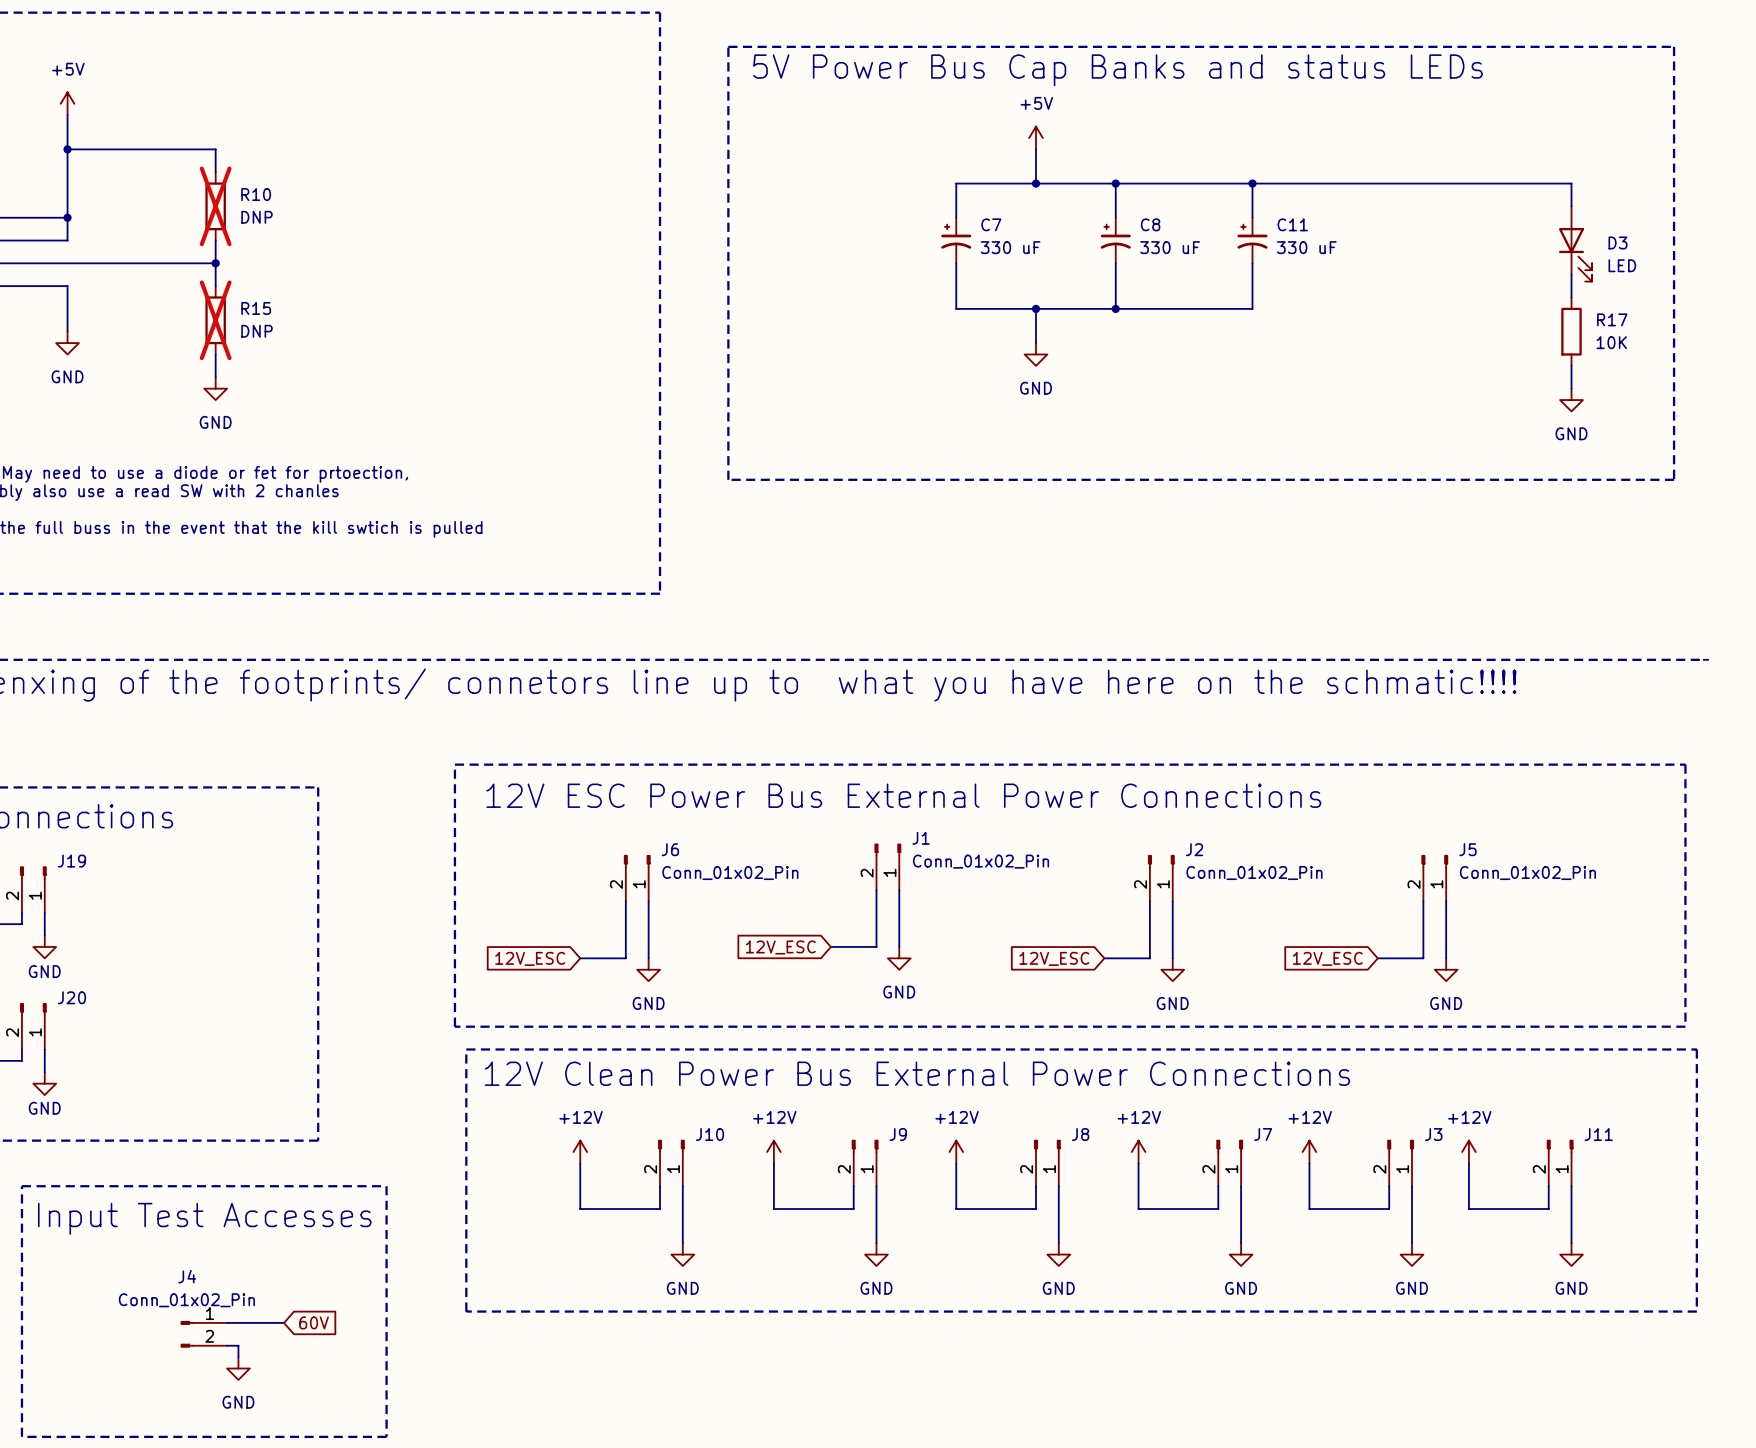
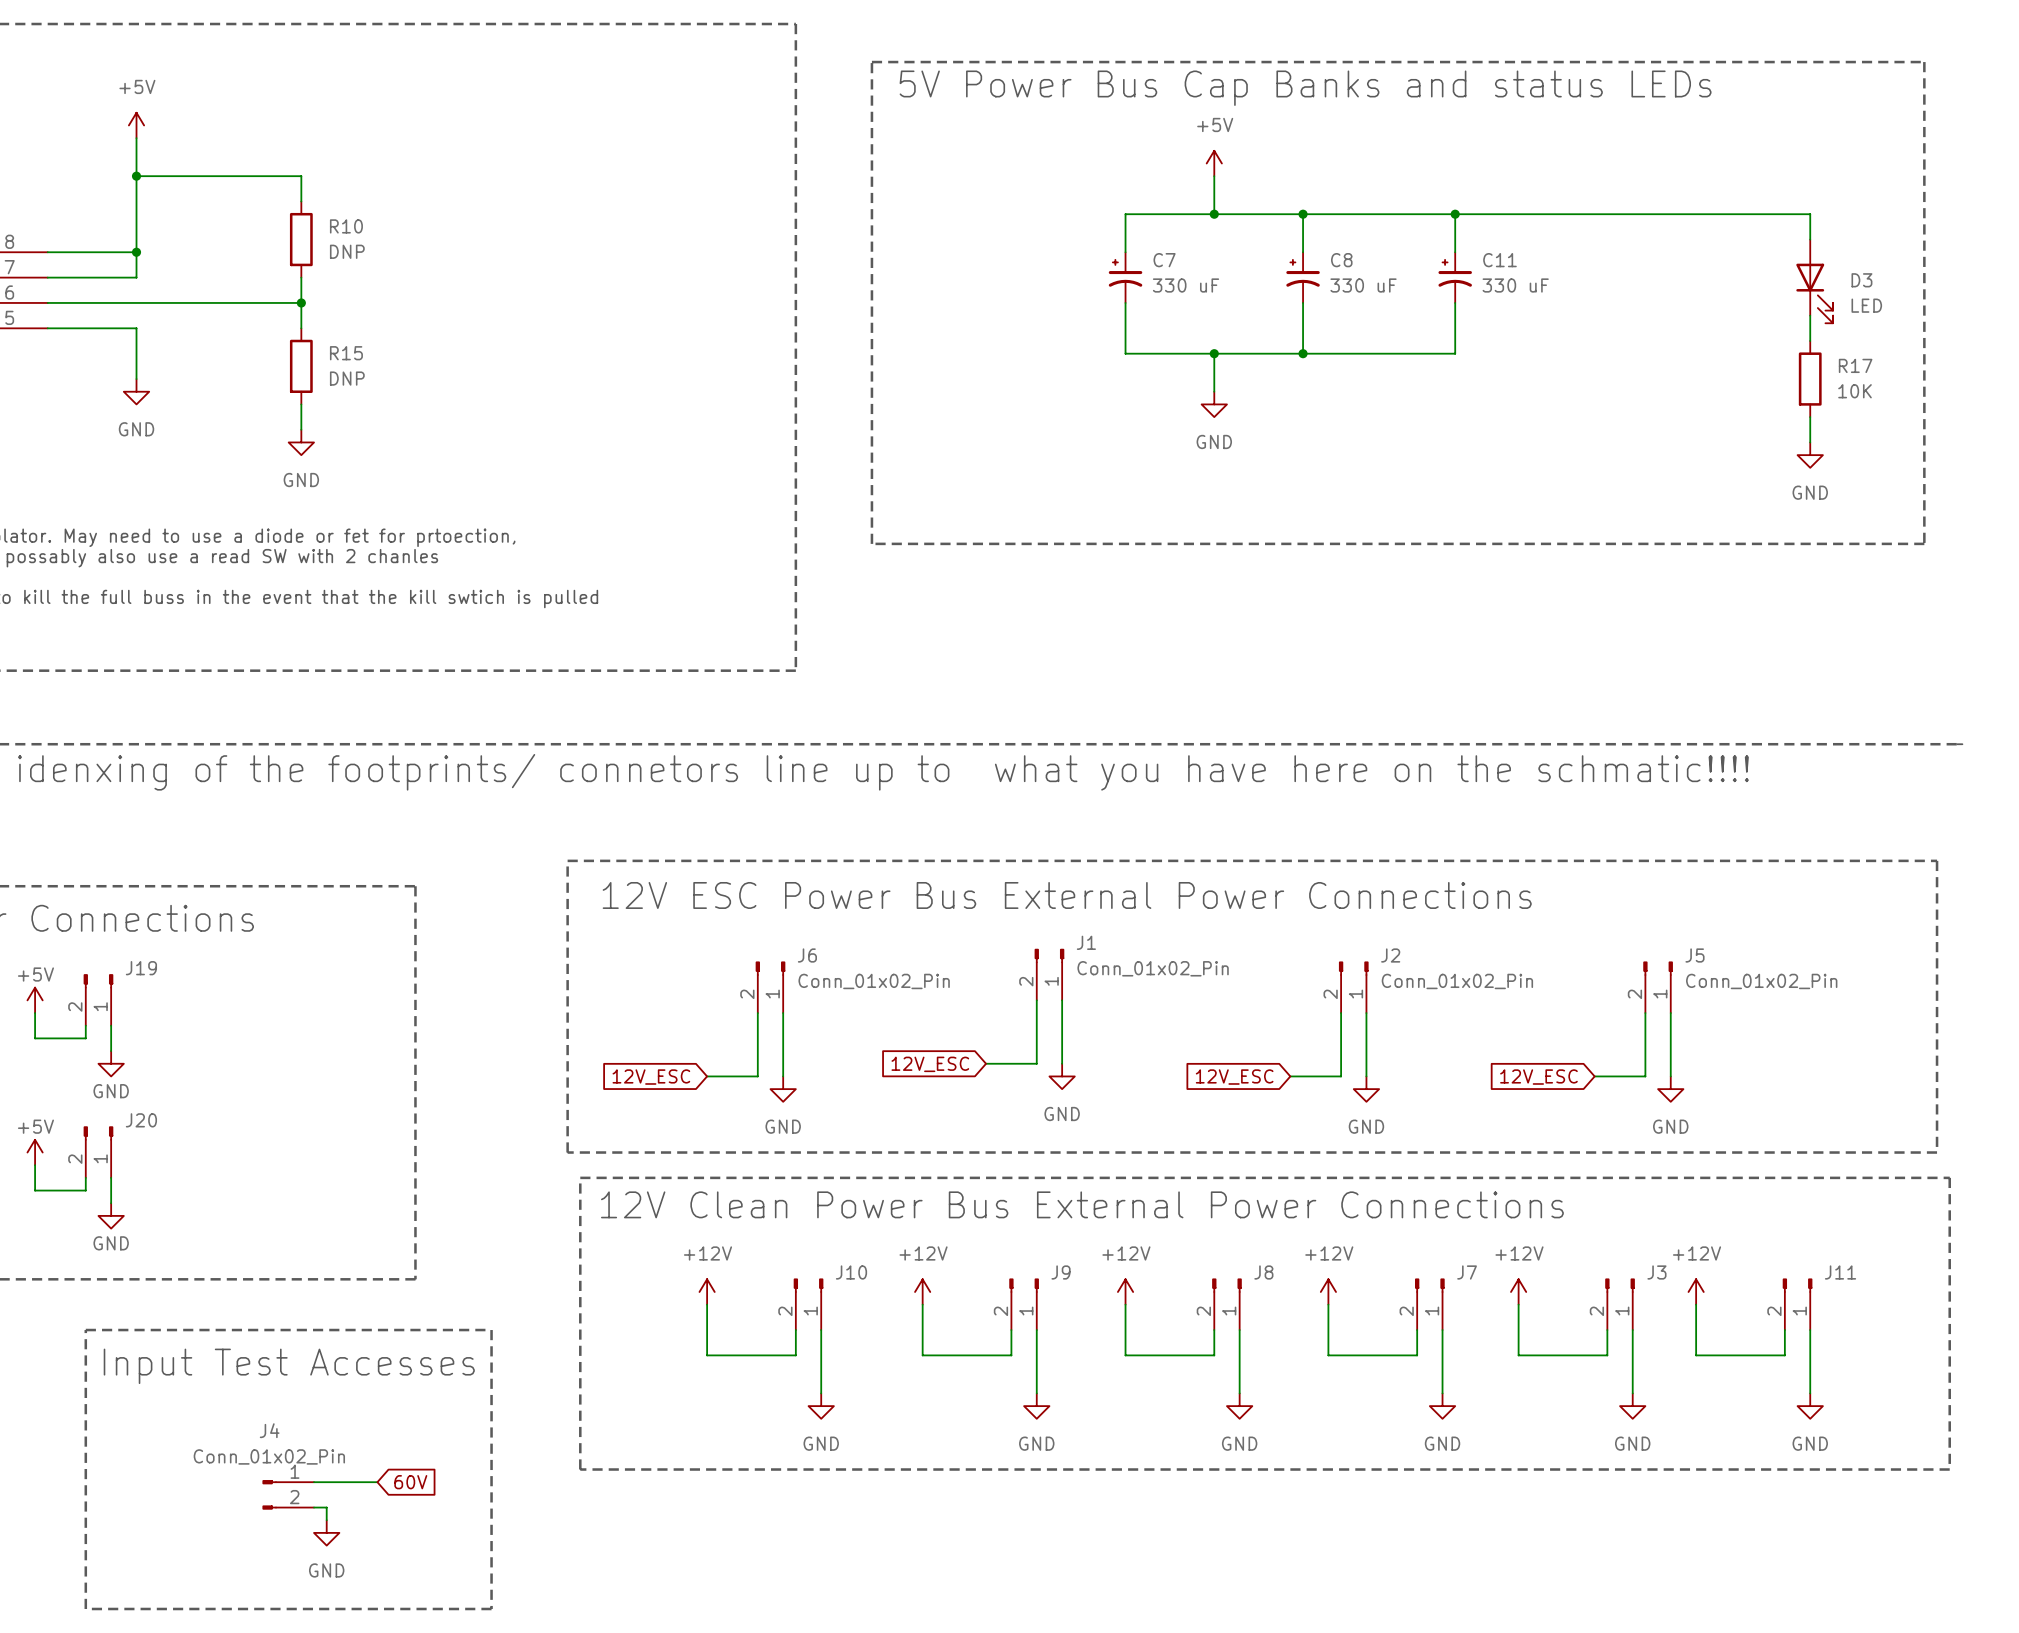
R10 do-not-place cross: (215, 206) -> none
R15 do-not-place cross: (215, 320) -> none

